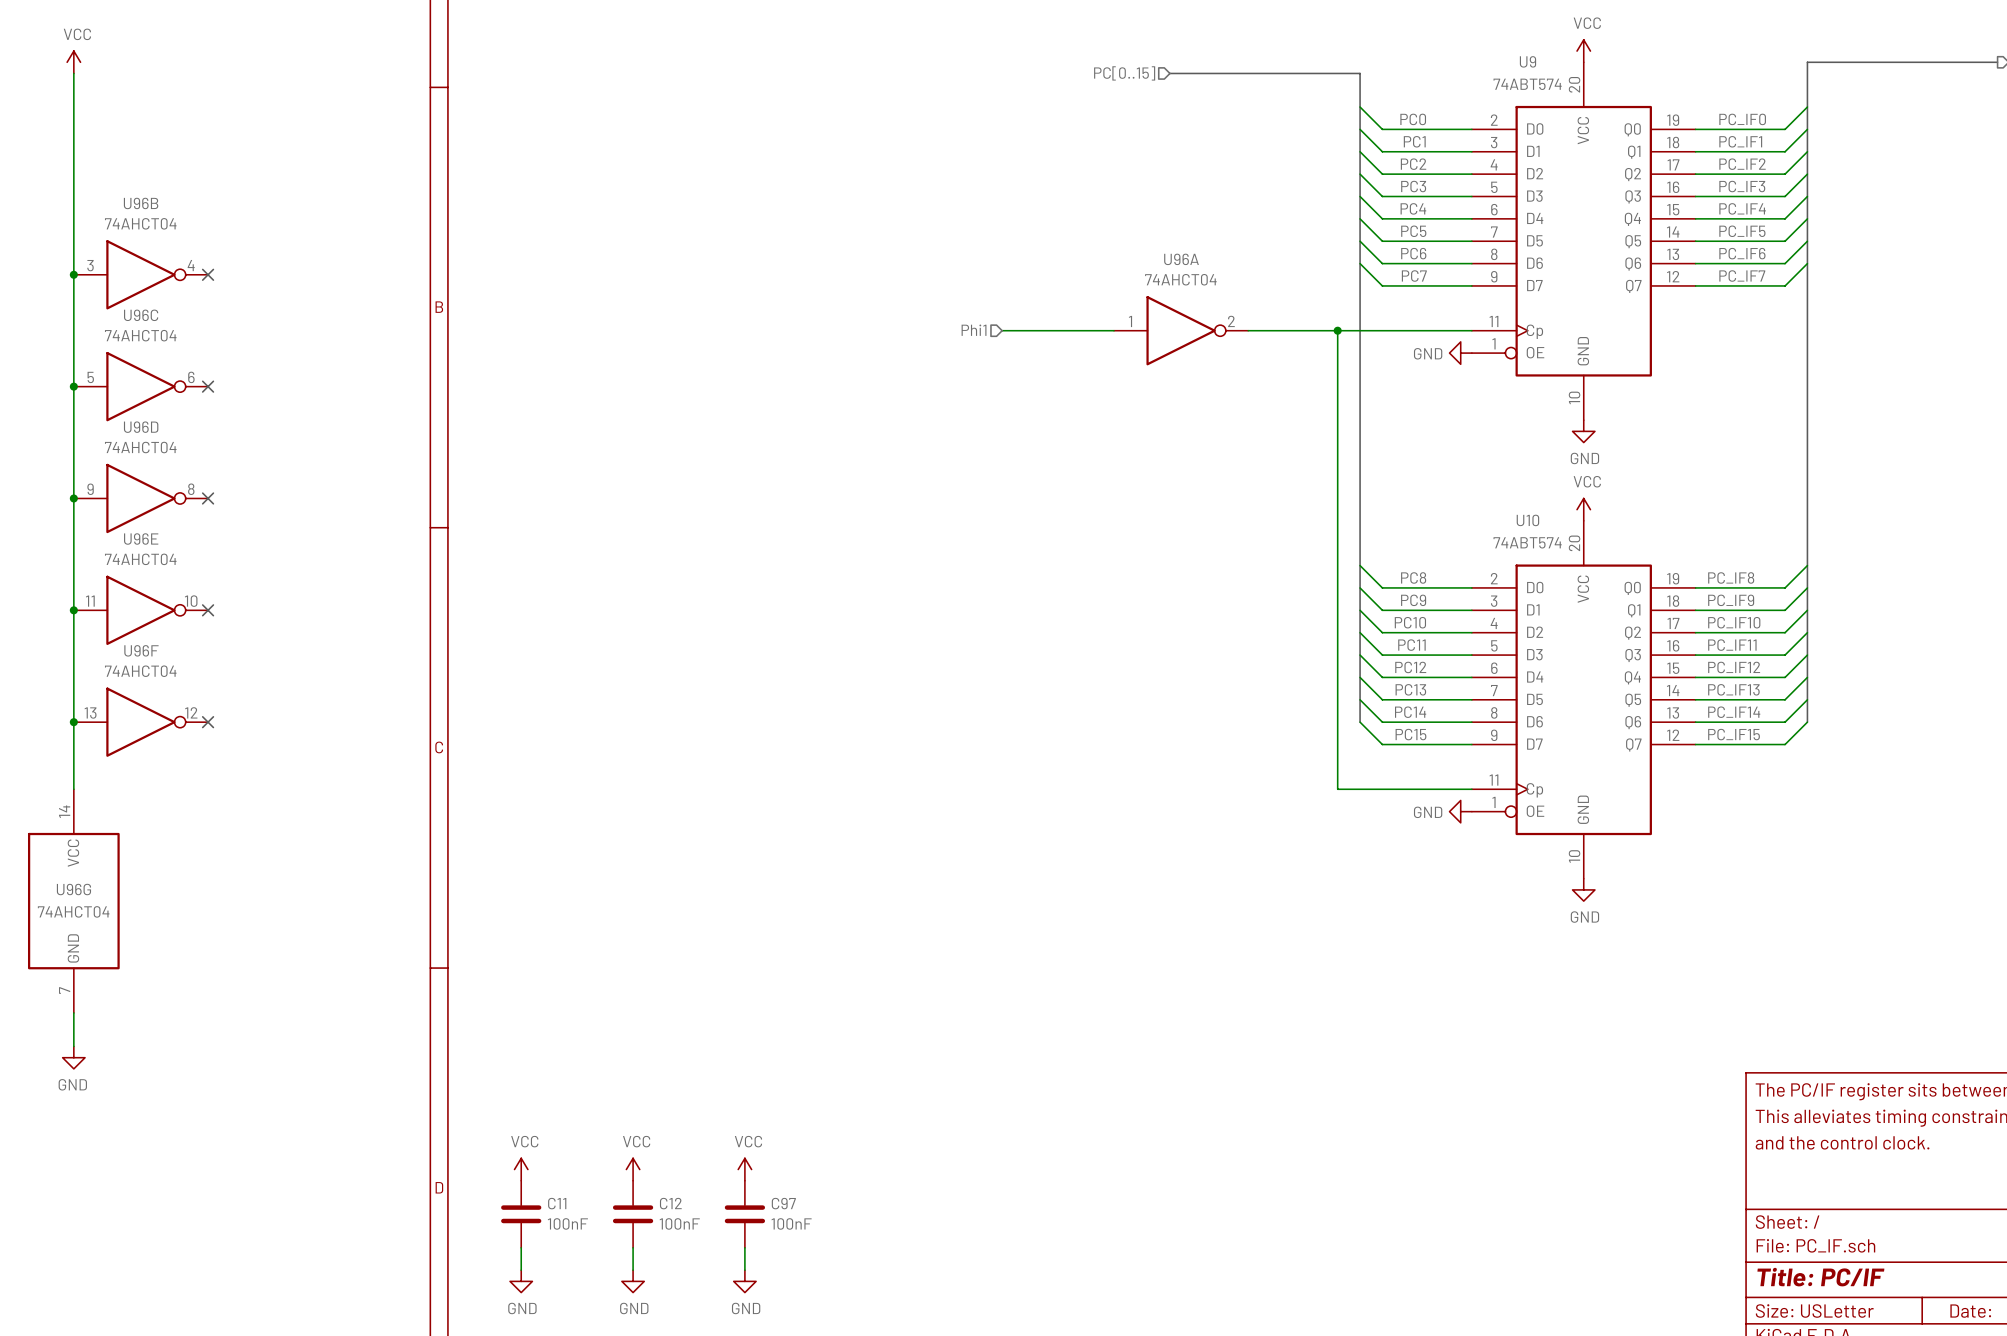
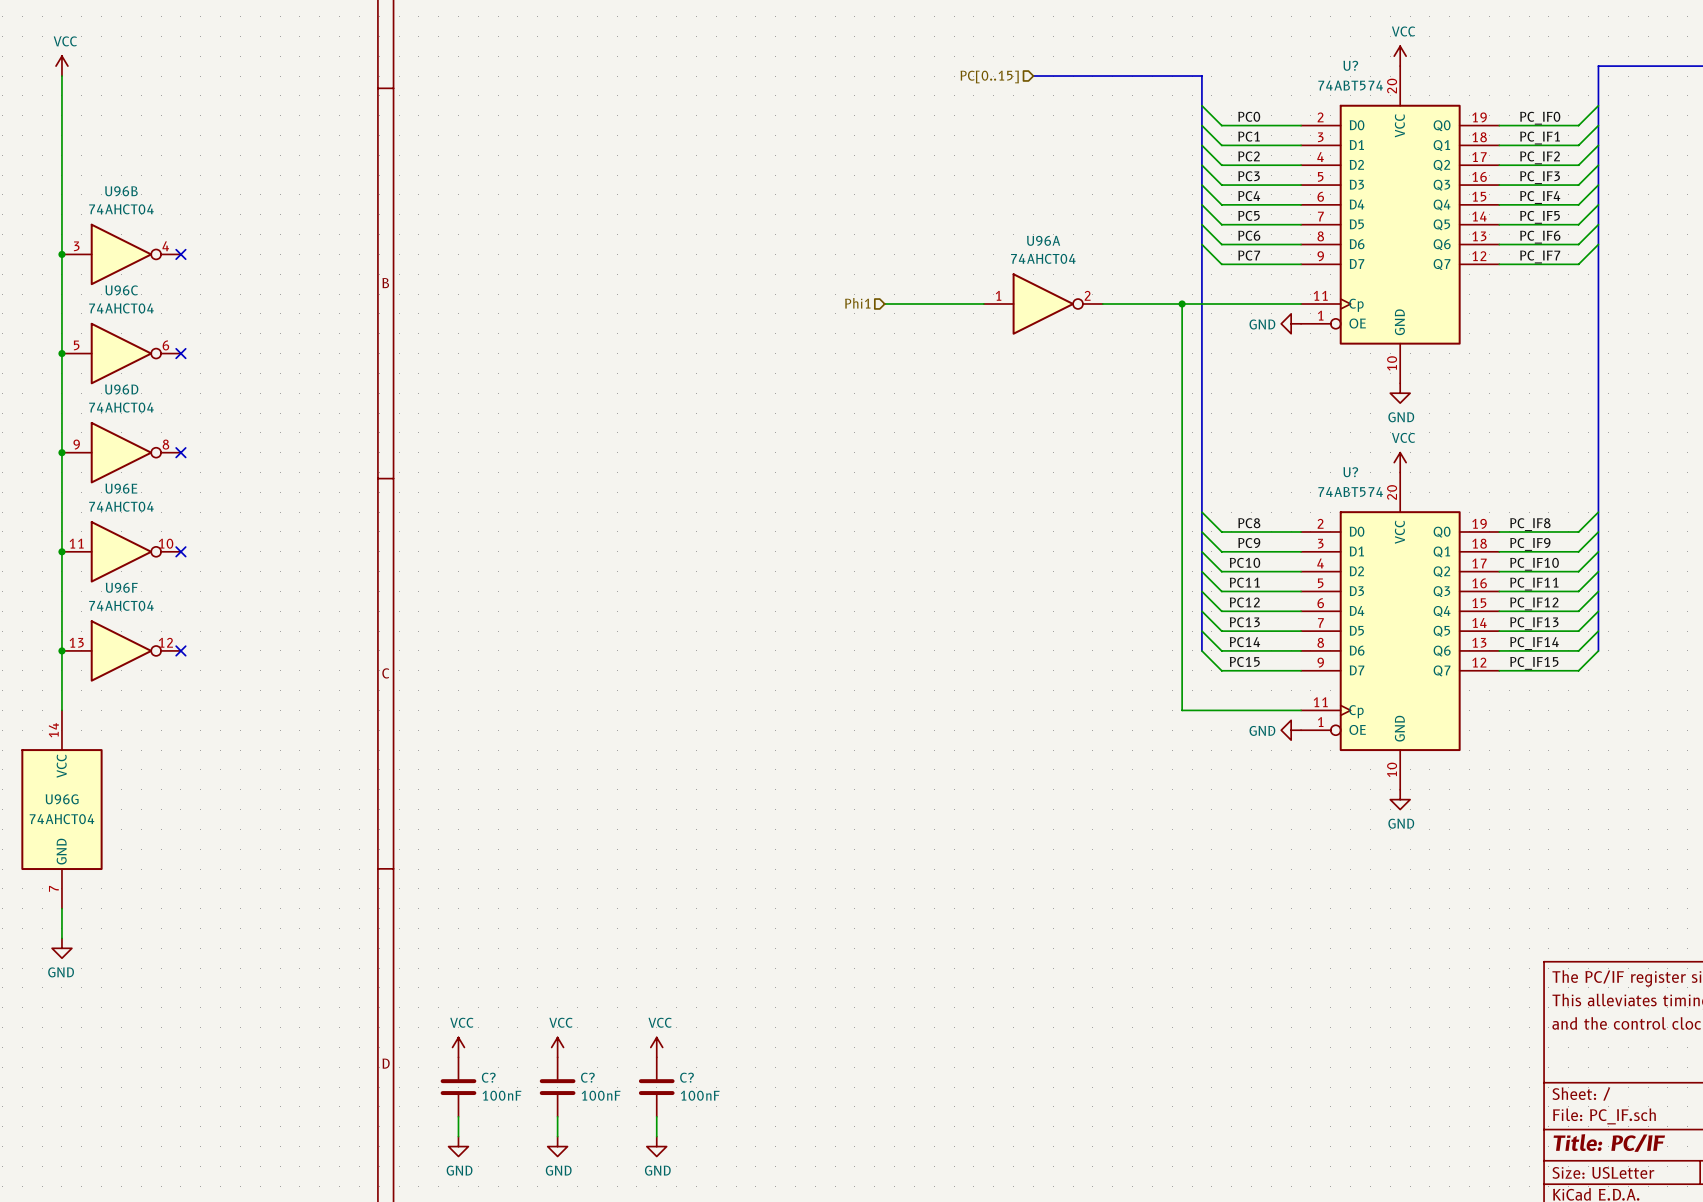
U9 name: U9 (1527, 61) -> U? (1350, 65)
U10 name: U10 (1527, 520) -> U? (1350, 472)
C11 name: C11 (557, 1203) -> C? (488, 1077)
C12 name: C12 (670, 1203) -> C? (587, 1077)
C97 name: C97 (783, 1203) -> C? (687, 1077)

